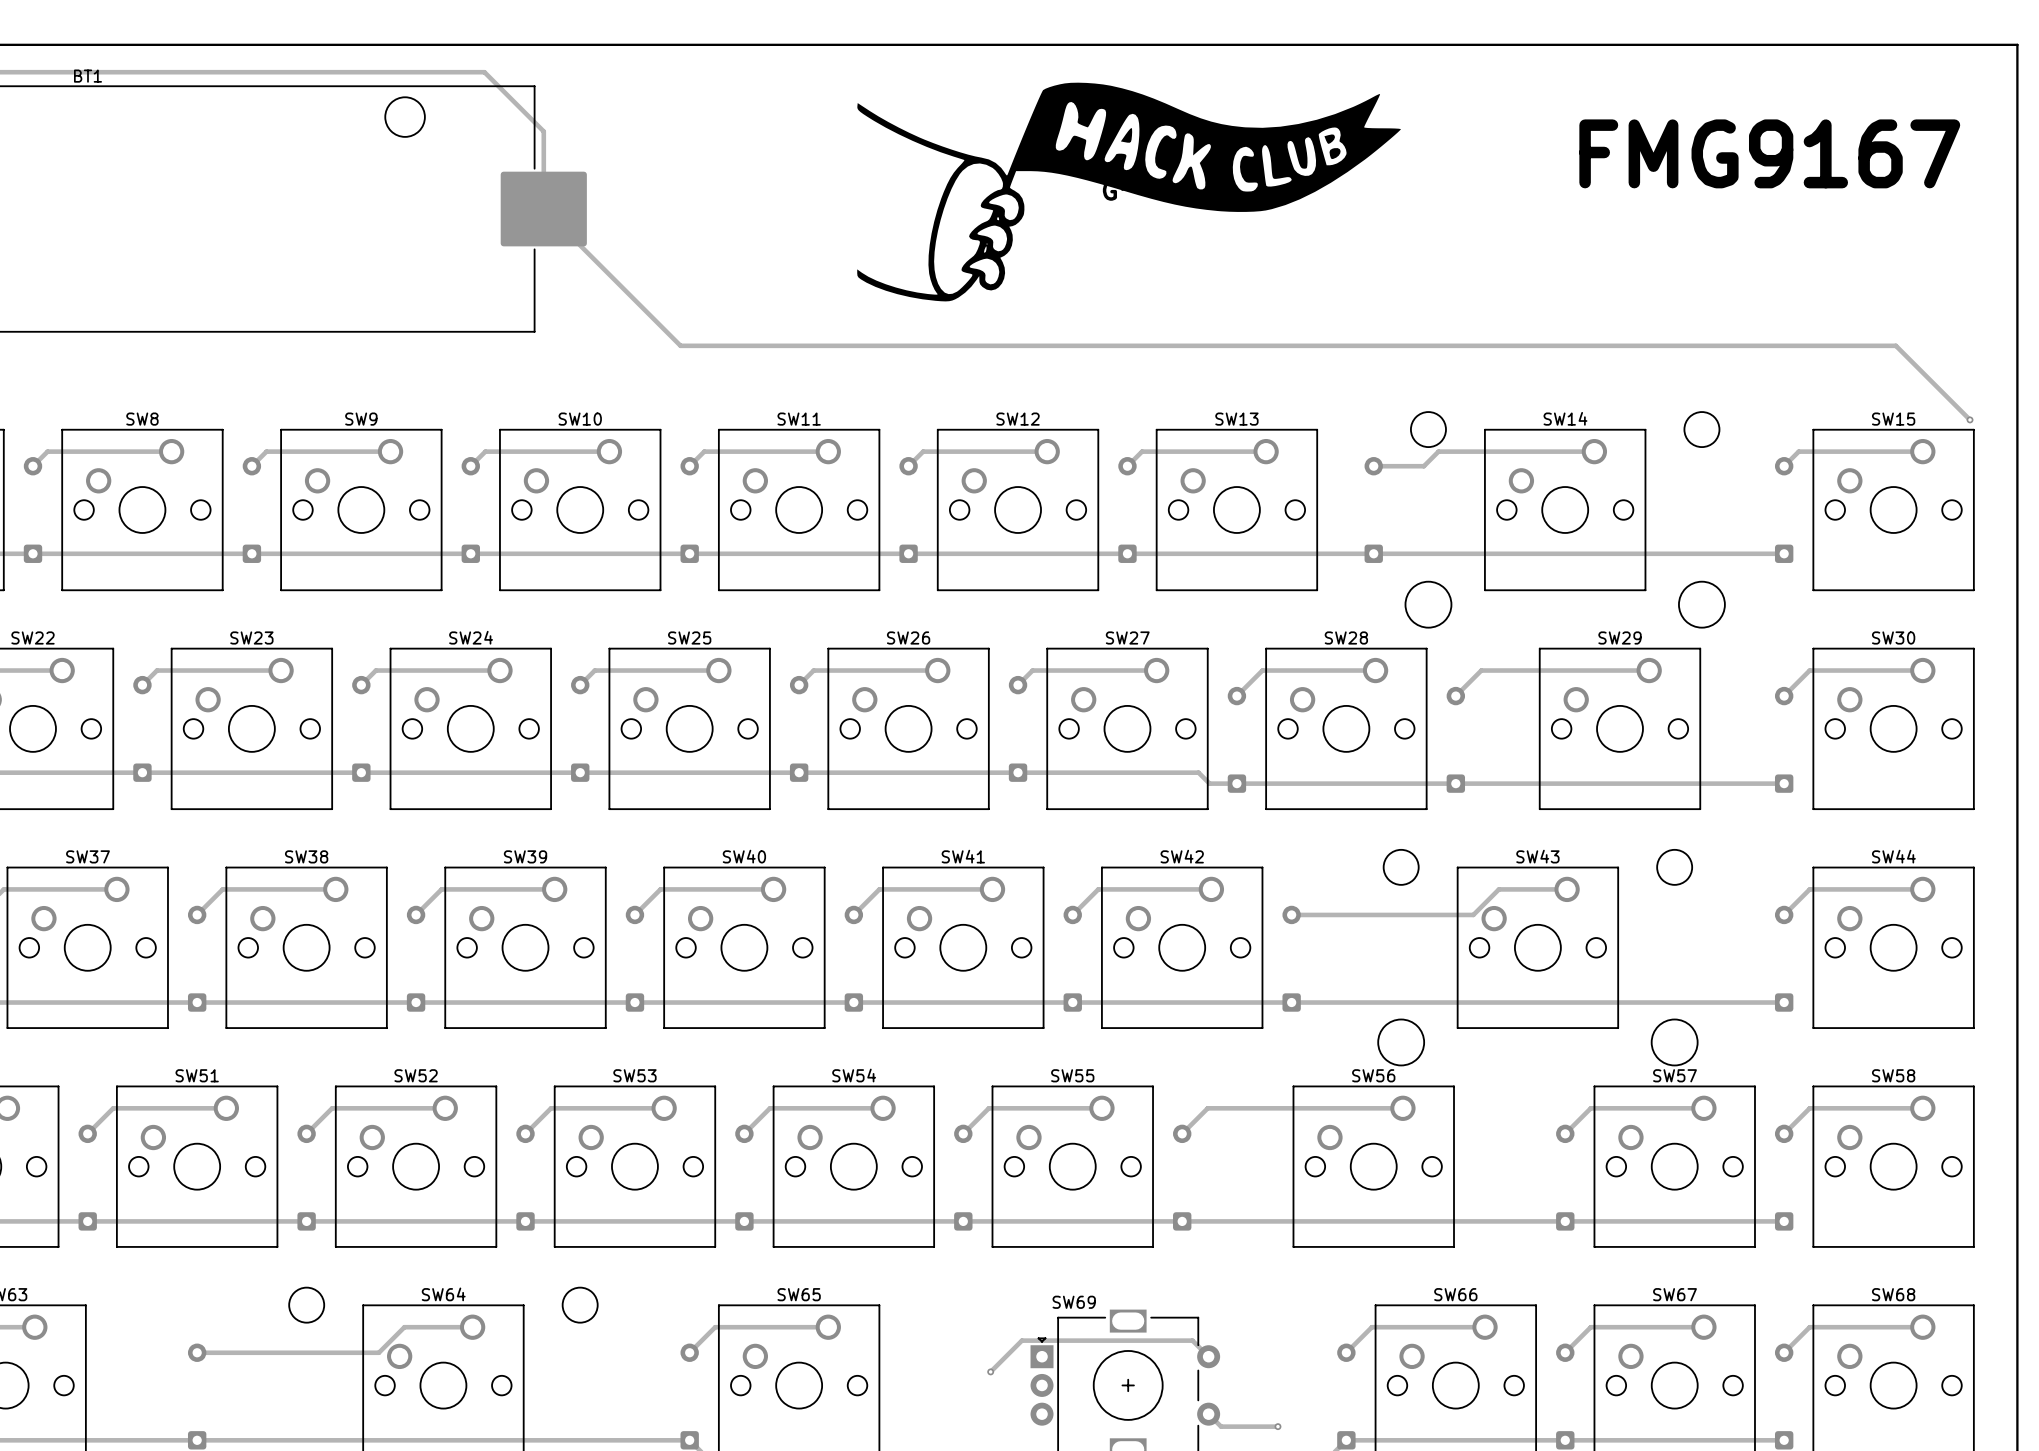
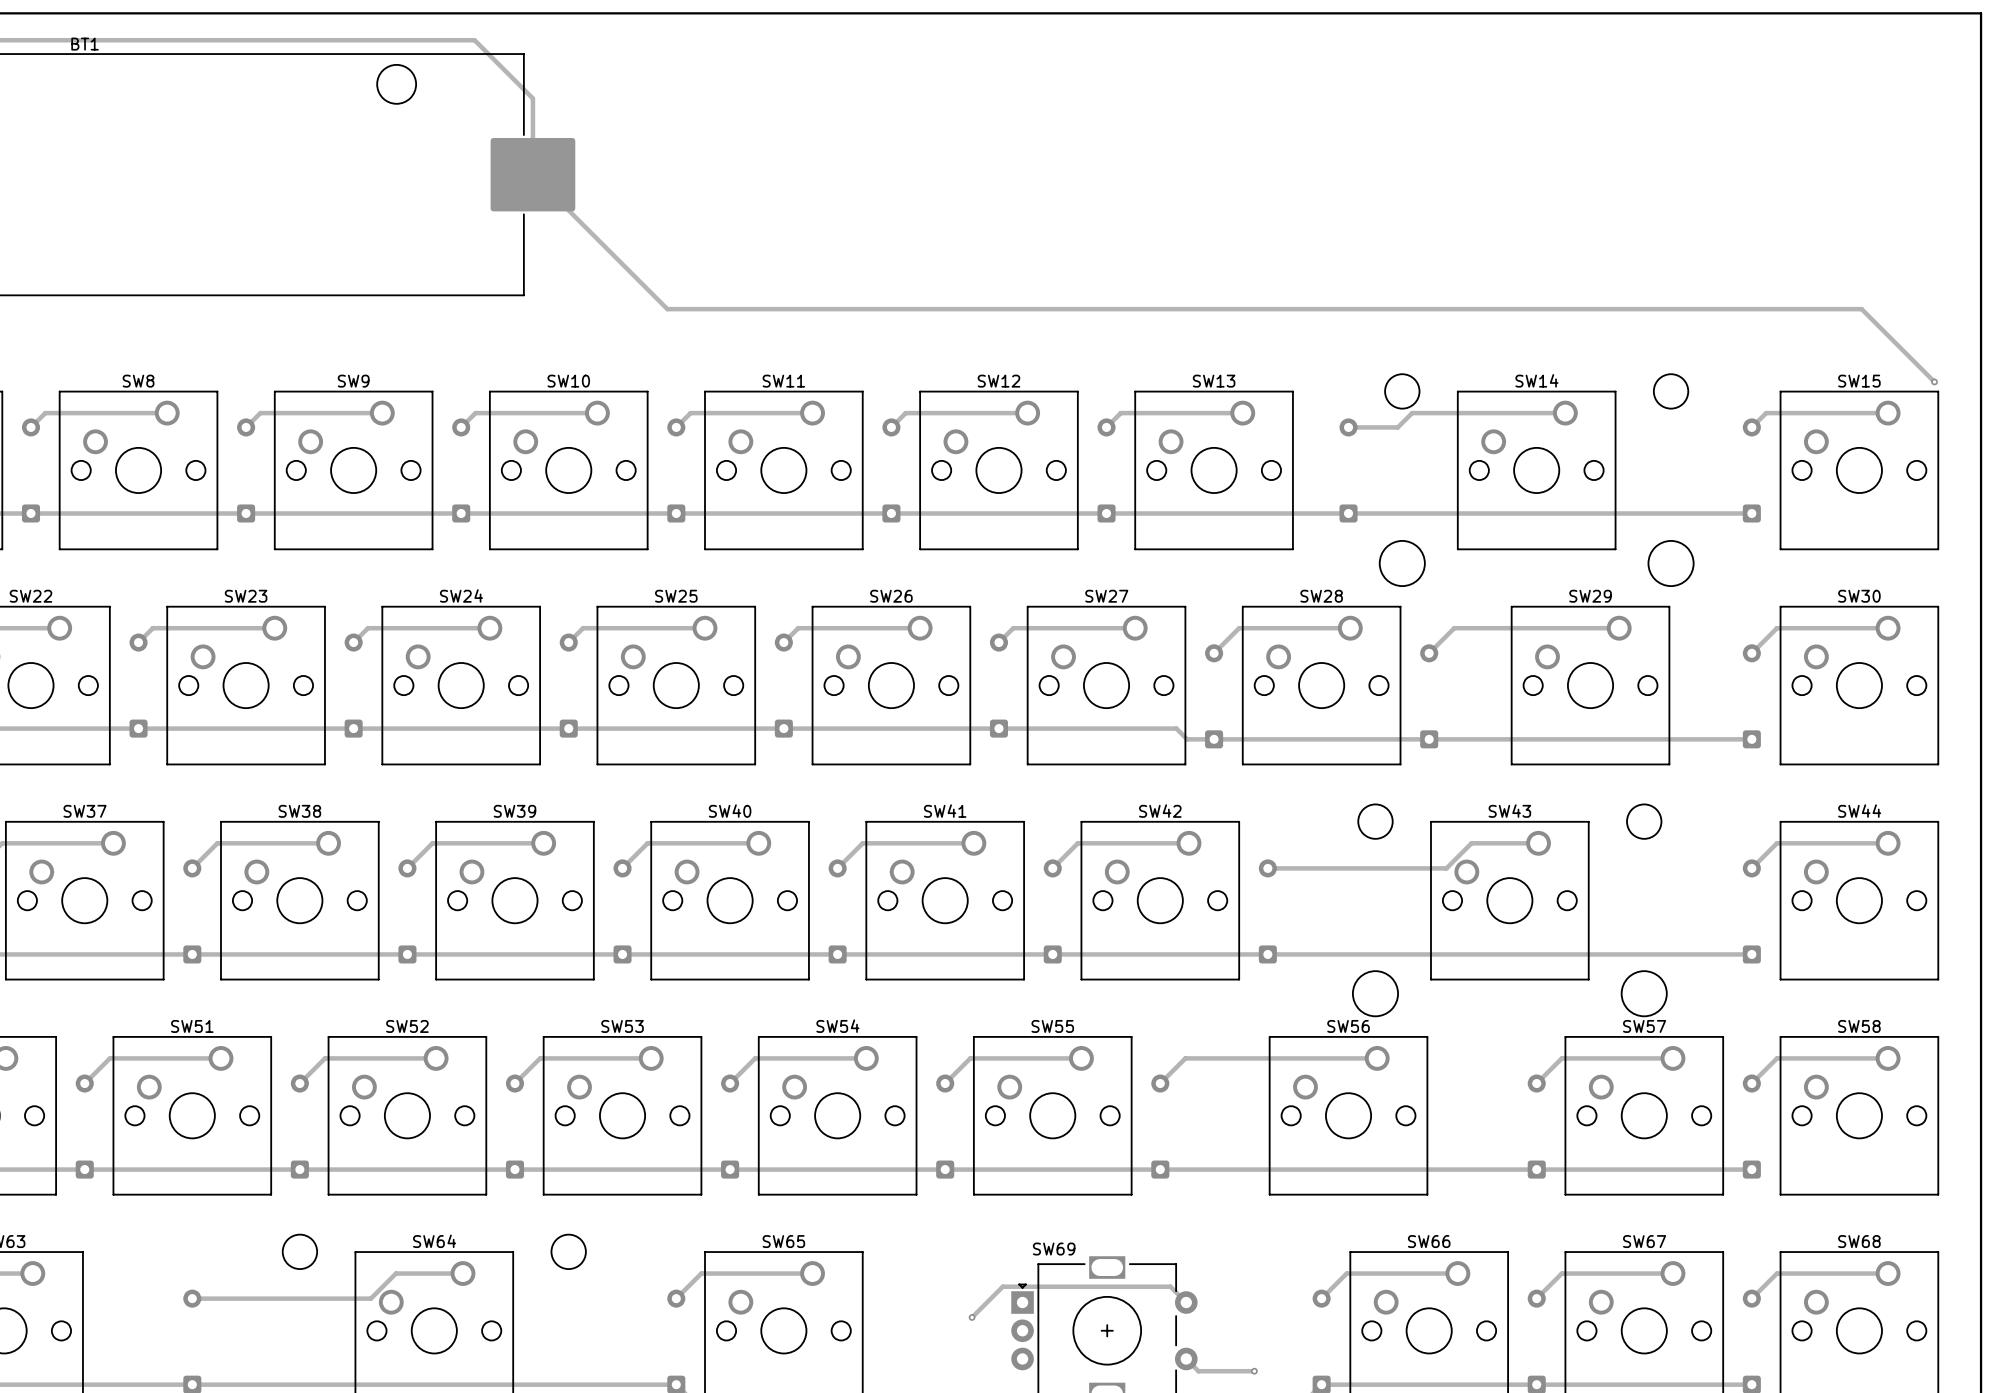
text: FMG9167 (1769, 153) -> none
part: (1129, 192) -> none

